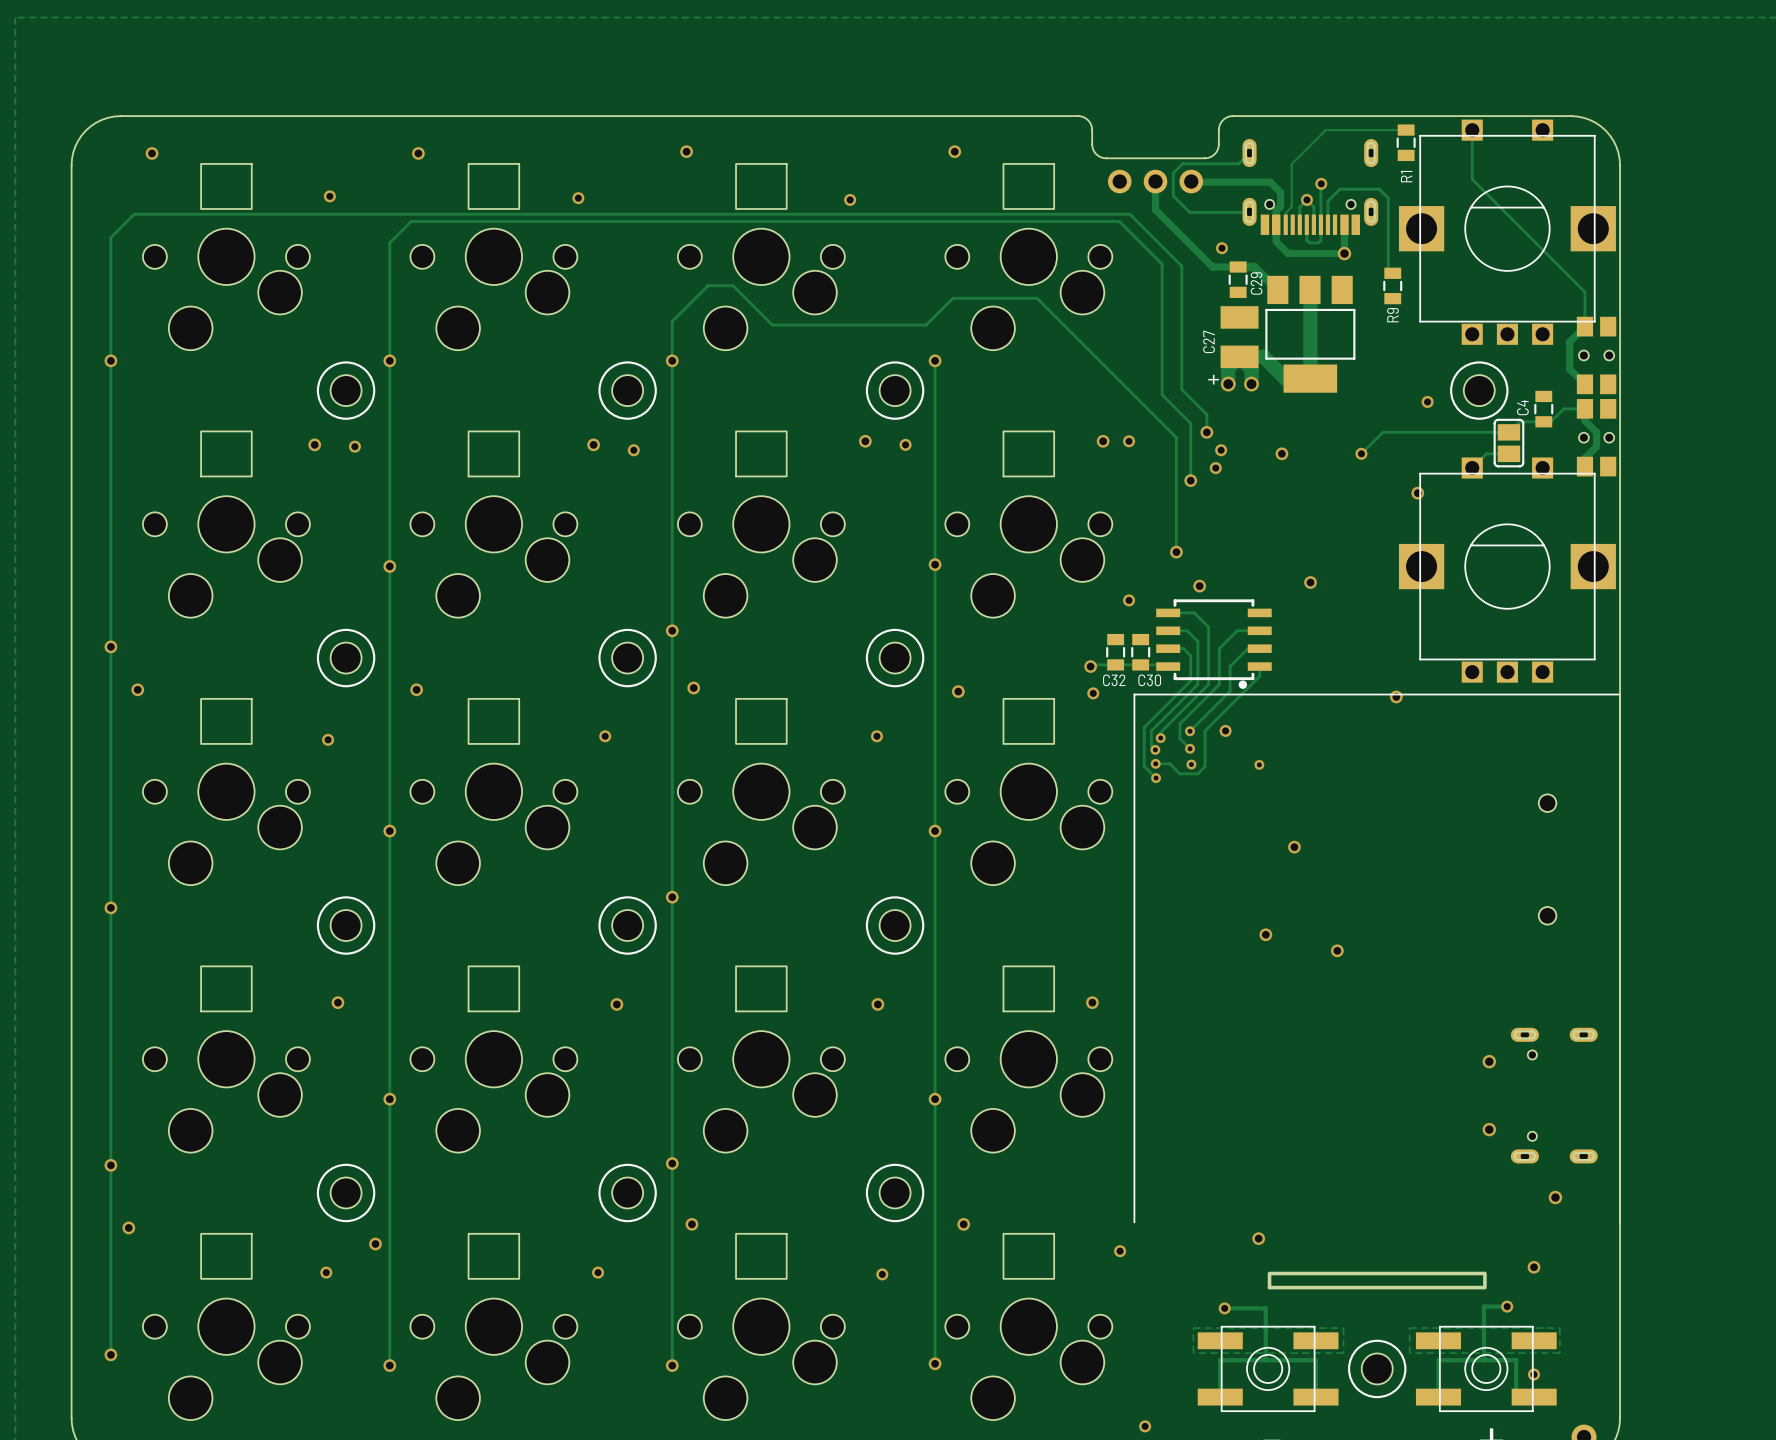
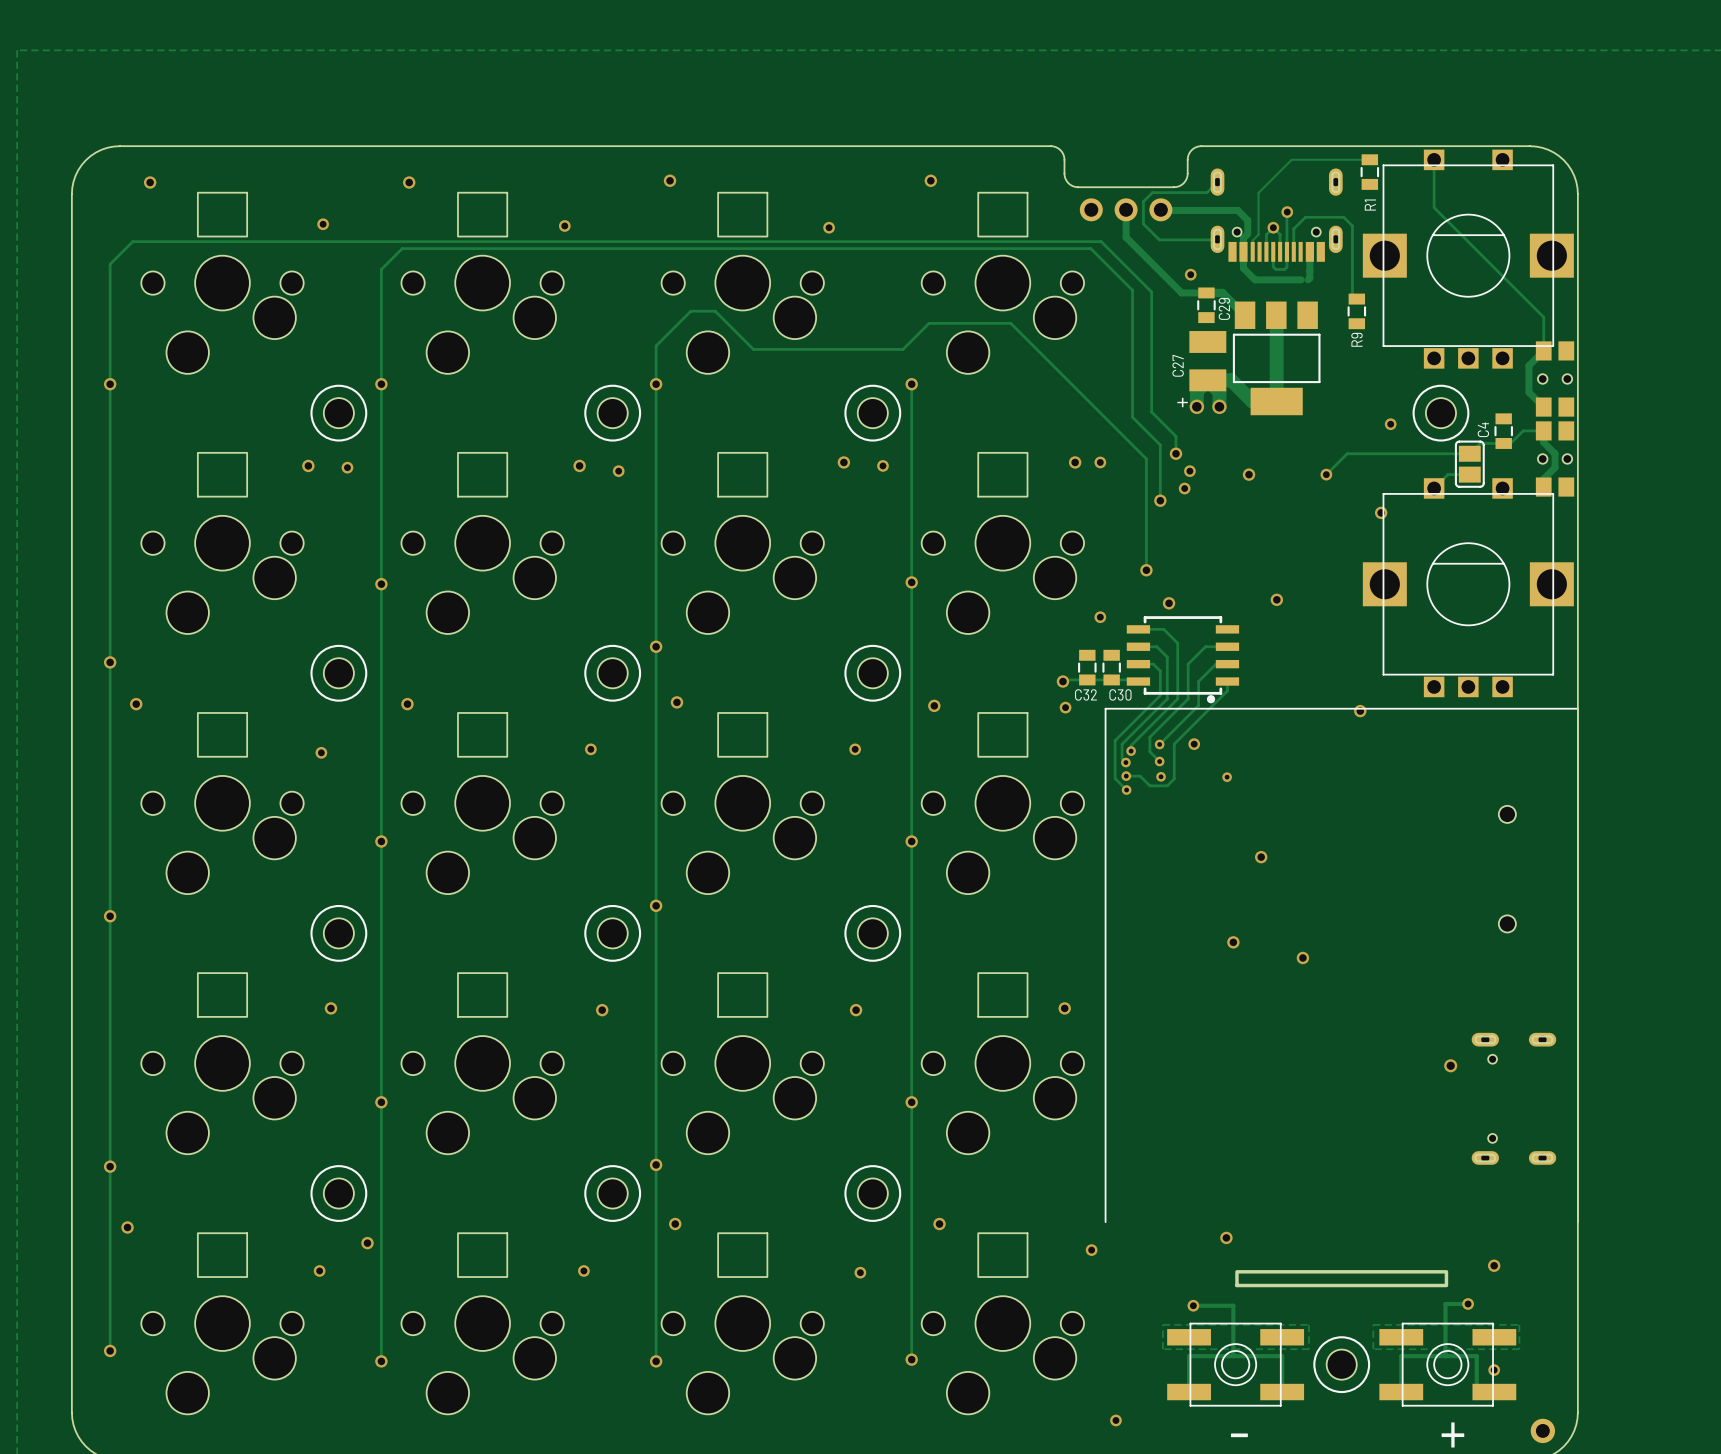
via: (1344, 253) -> none
via: (1489, 1129) -> none
via: (1555, 1197) -> none

